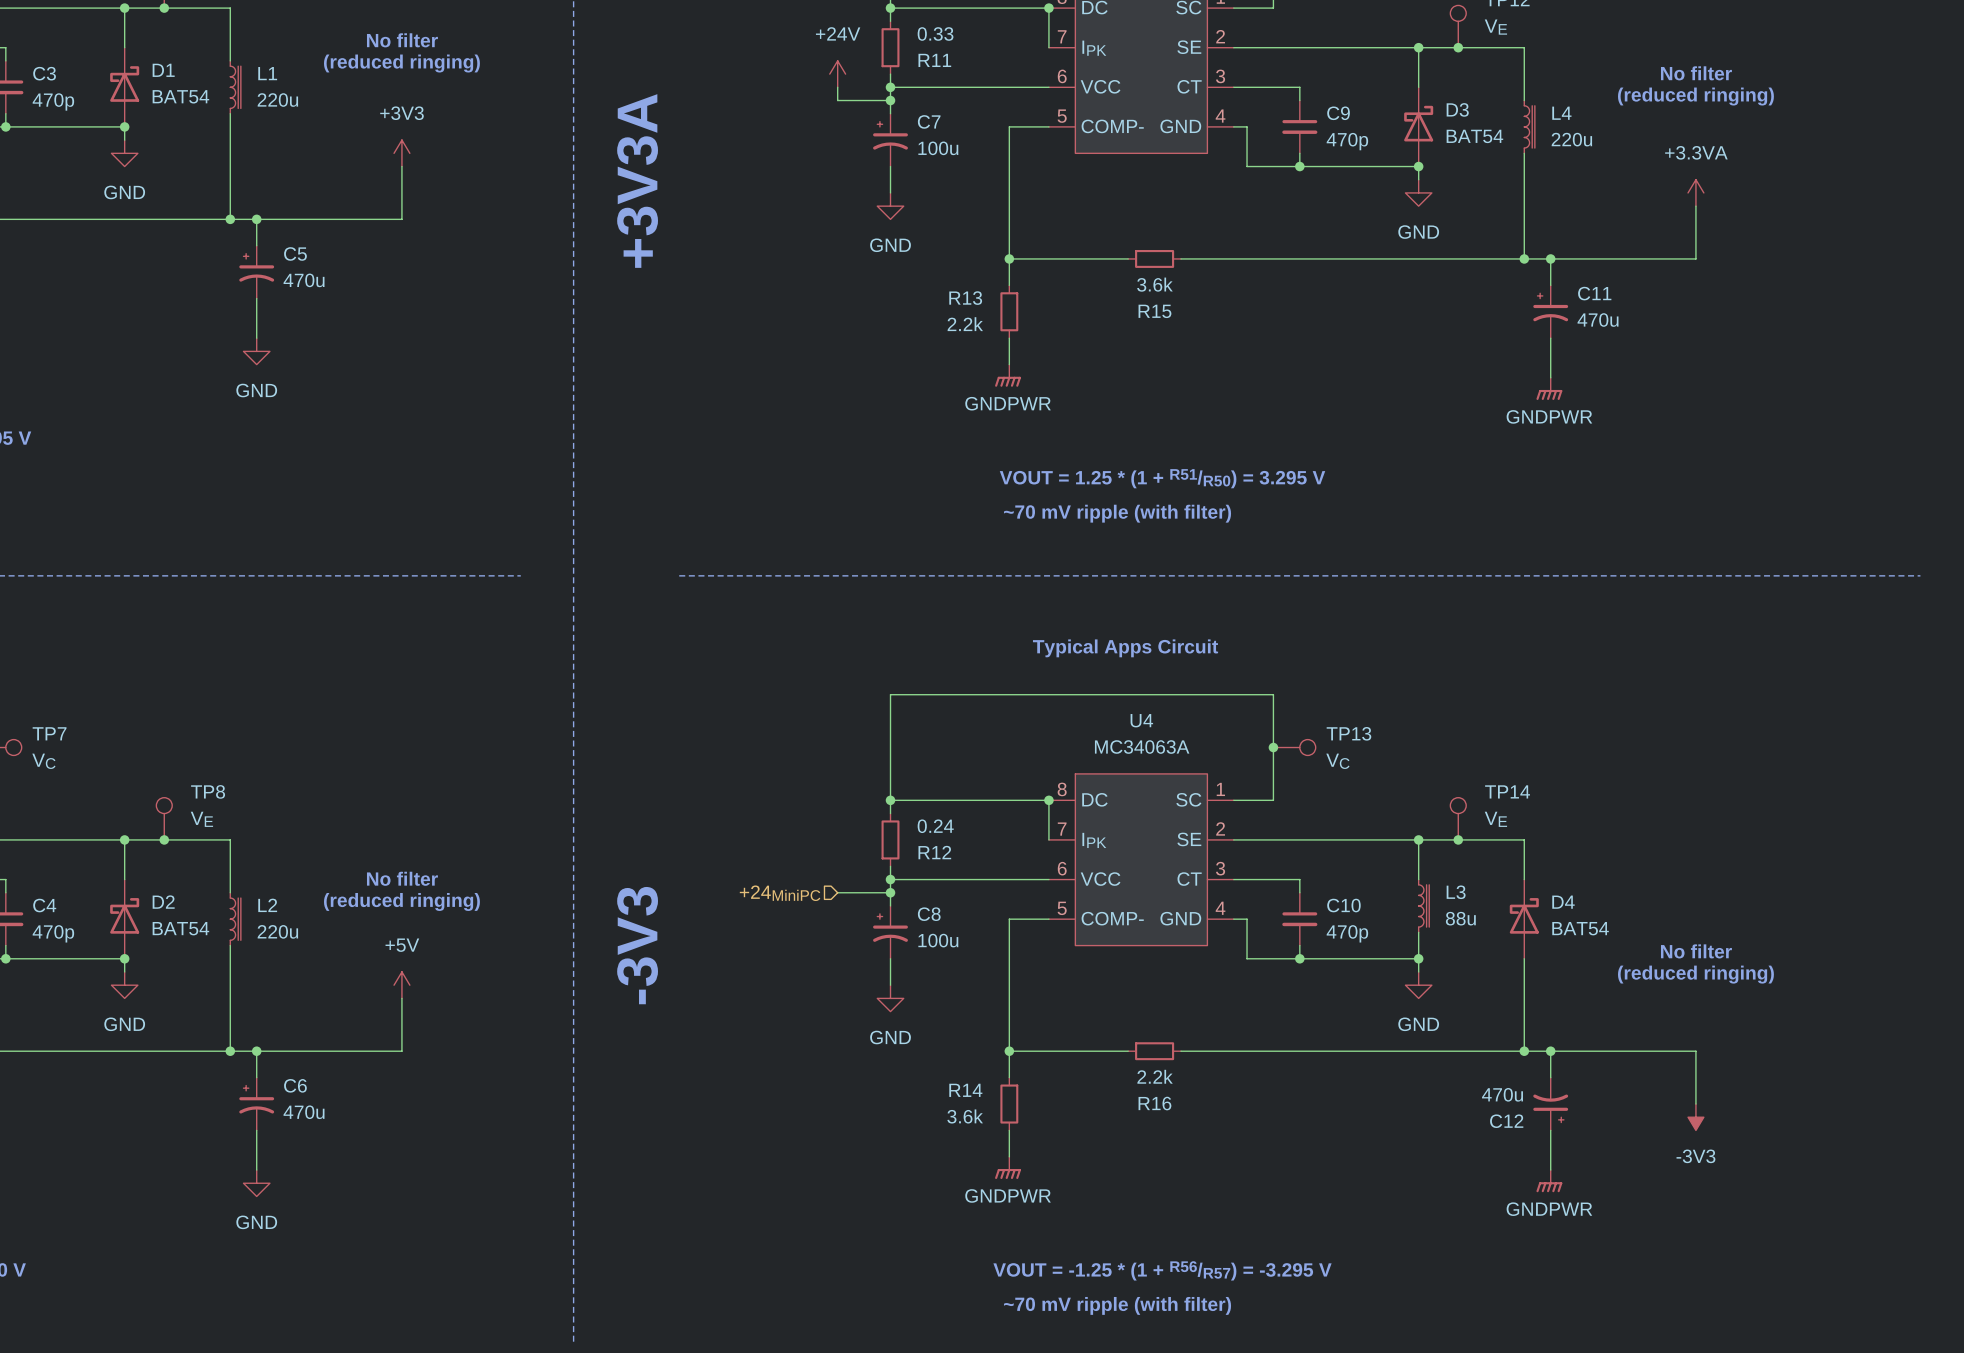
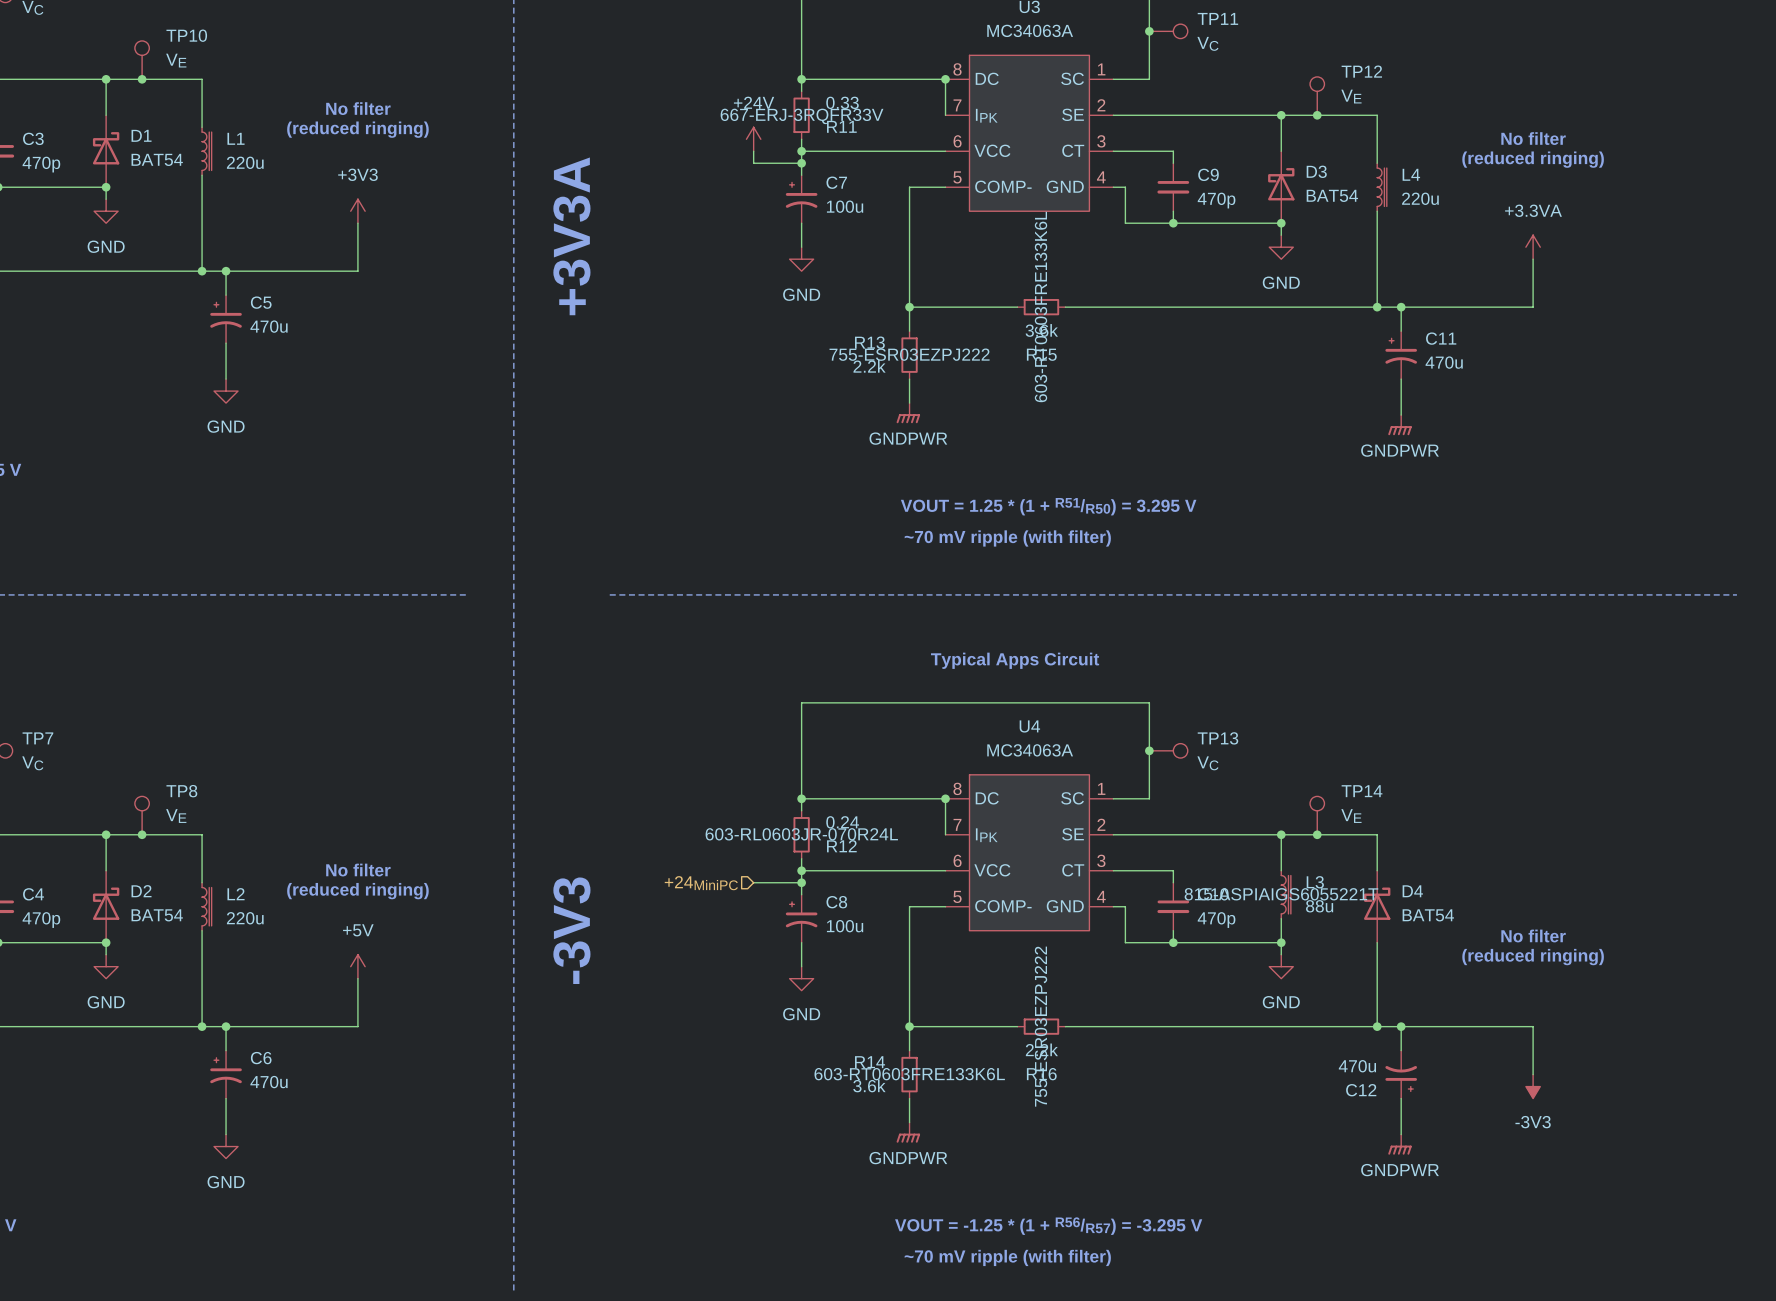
R11 text: none -> 667-ERJ-3RQFR33V (802, 116)
R15 text: none -> 603-RT0603FRE133K6L (1040, 307)
R13 text: none -> 755-ESR03EZPJ222 (909, 354)
R12 text: none -> 603-RL0603JR-070R24L (801, 834)
L3 text: none -> 815-ASPIAIGS6055221T (1281, 894)
R16 text: none -> 755-ESR03EZPJ222 (1040, 1026)
R14 text: none -> 603-RT0603FRE133K6L (909, 1074)

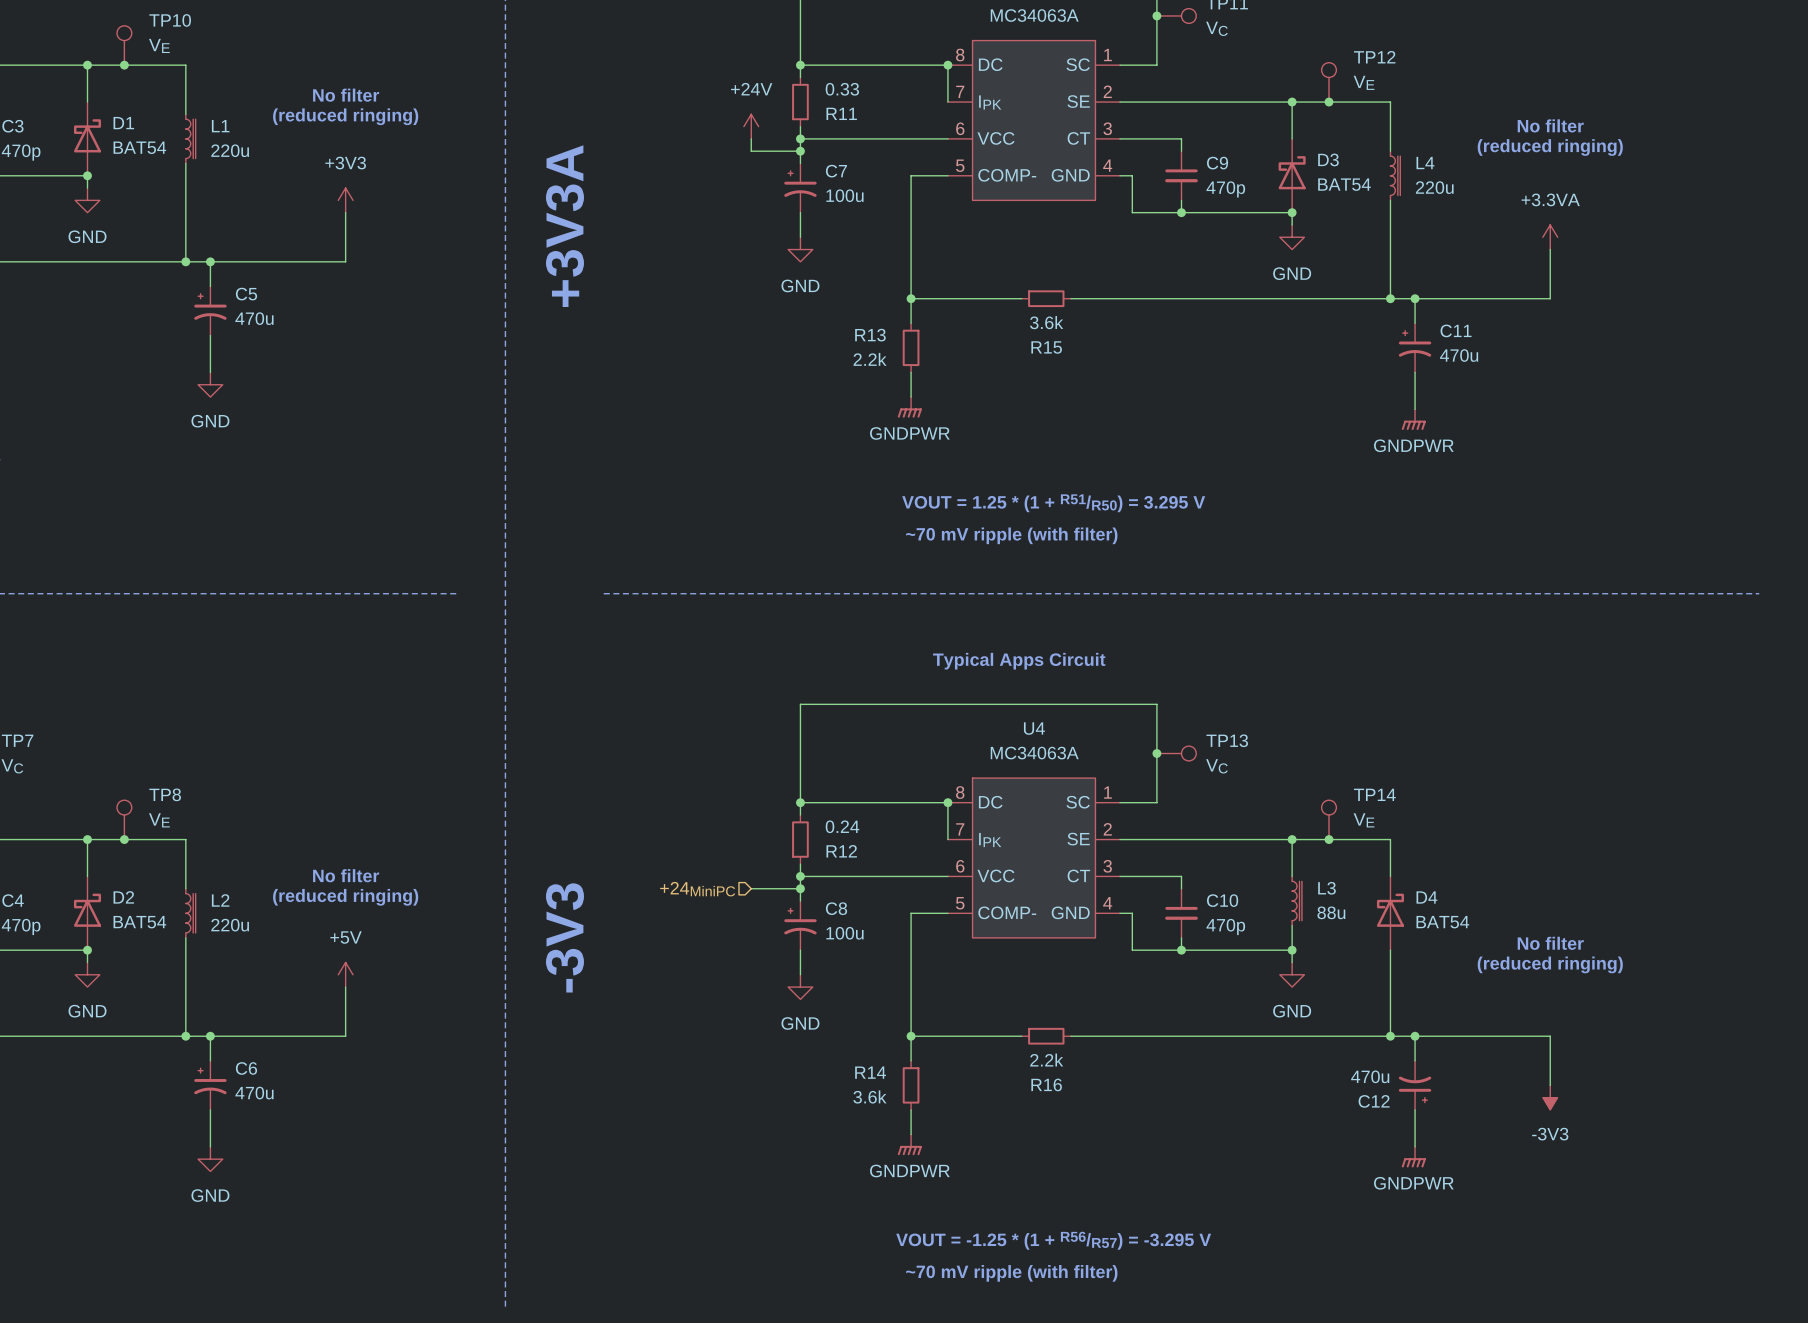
R11 text: 667-ERJ-3RQFR33V (802, 116) -> none
R15 text: 603-RT0603FRE133K6L (1040, 307) -> none
R13 text: 755-ESR03EZPJ222 (909, 354) -> none
R12 text: 603-RL0603JR-070R24L (801, 834) -> none
L3 text: 815-ASPIAIGS6055221T (1281, 894) -> none
R16 text: 755-ESR03EZPJ222 (1040, 1026) -> none
R14 text: 603-RT0603FRE133K6L (909, 1074) -> none

